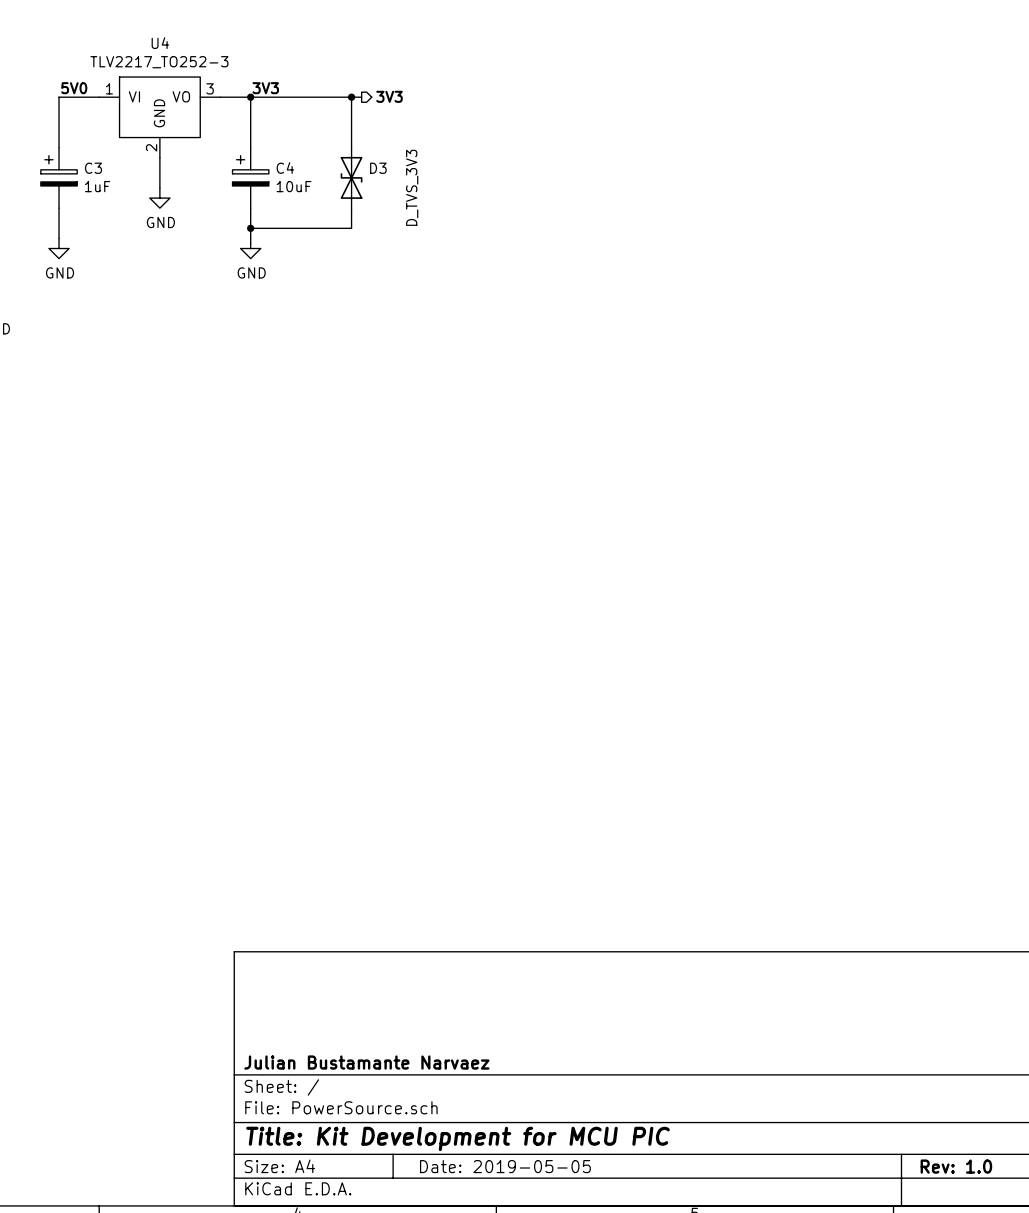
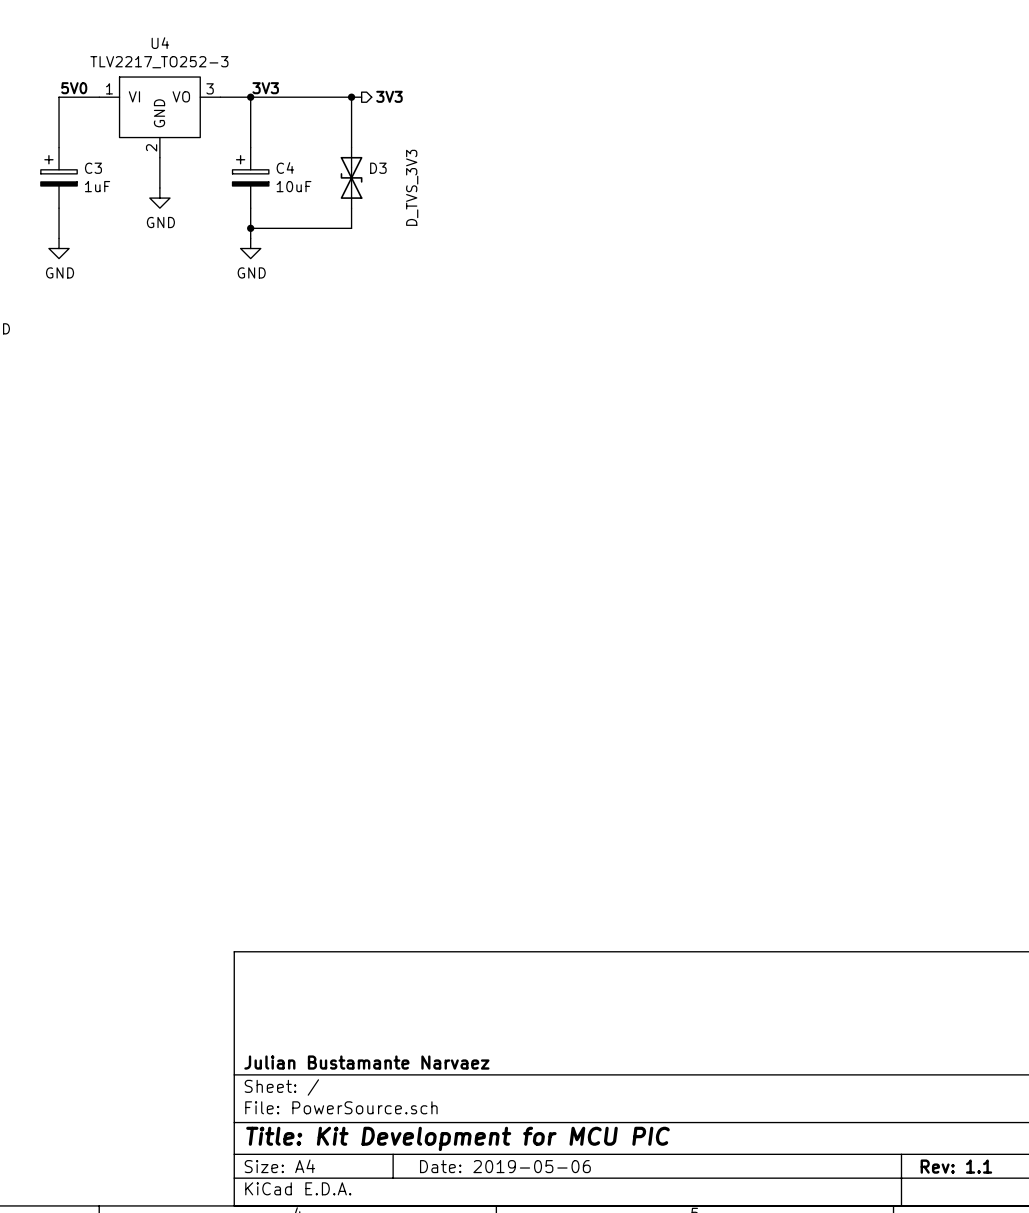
title block: Date: 2019-05-05 (505, 1166) -> Date: 2019-05-06 (505, 1166)
title block: Rev: 1.0 (956, 1166) -> Rev: 1.1 (956, 1166)

